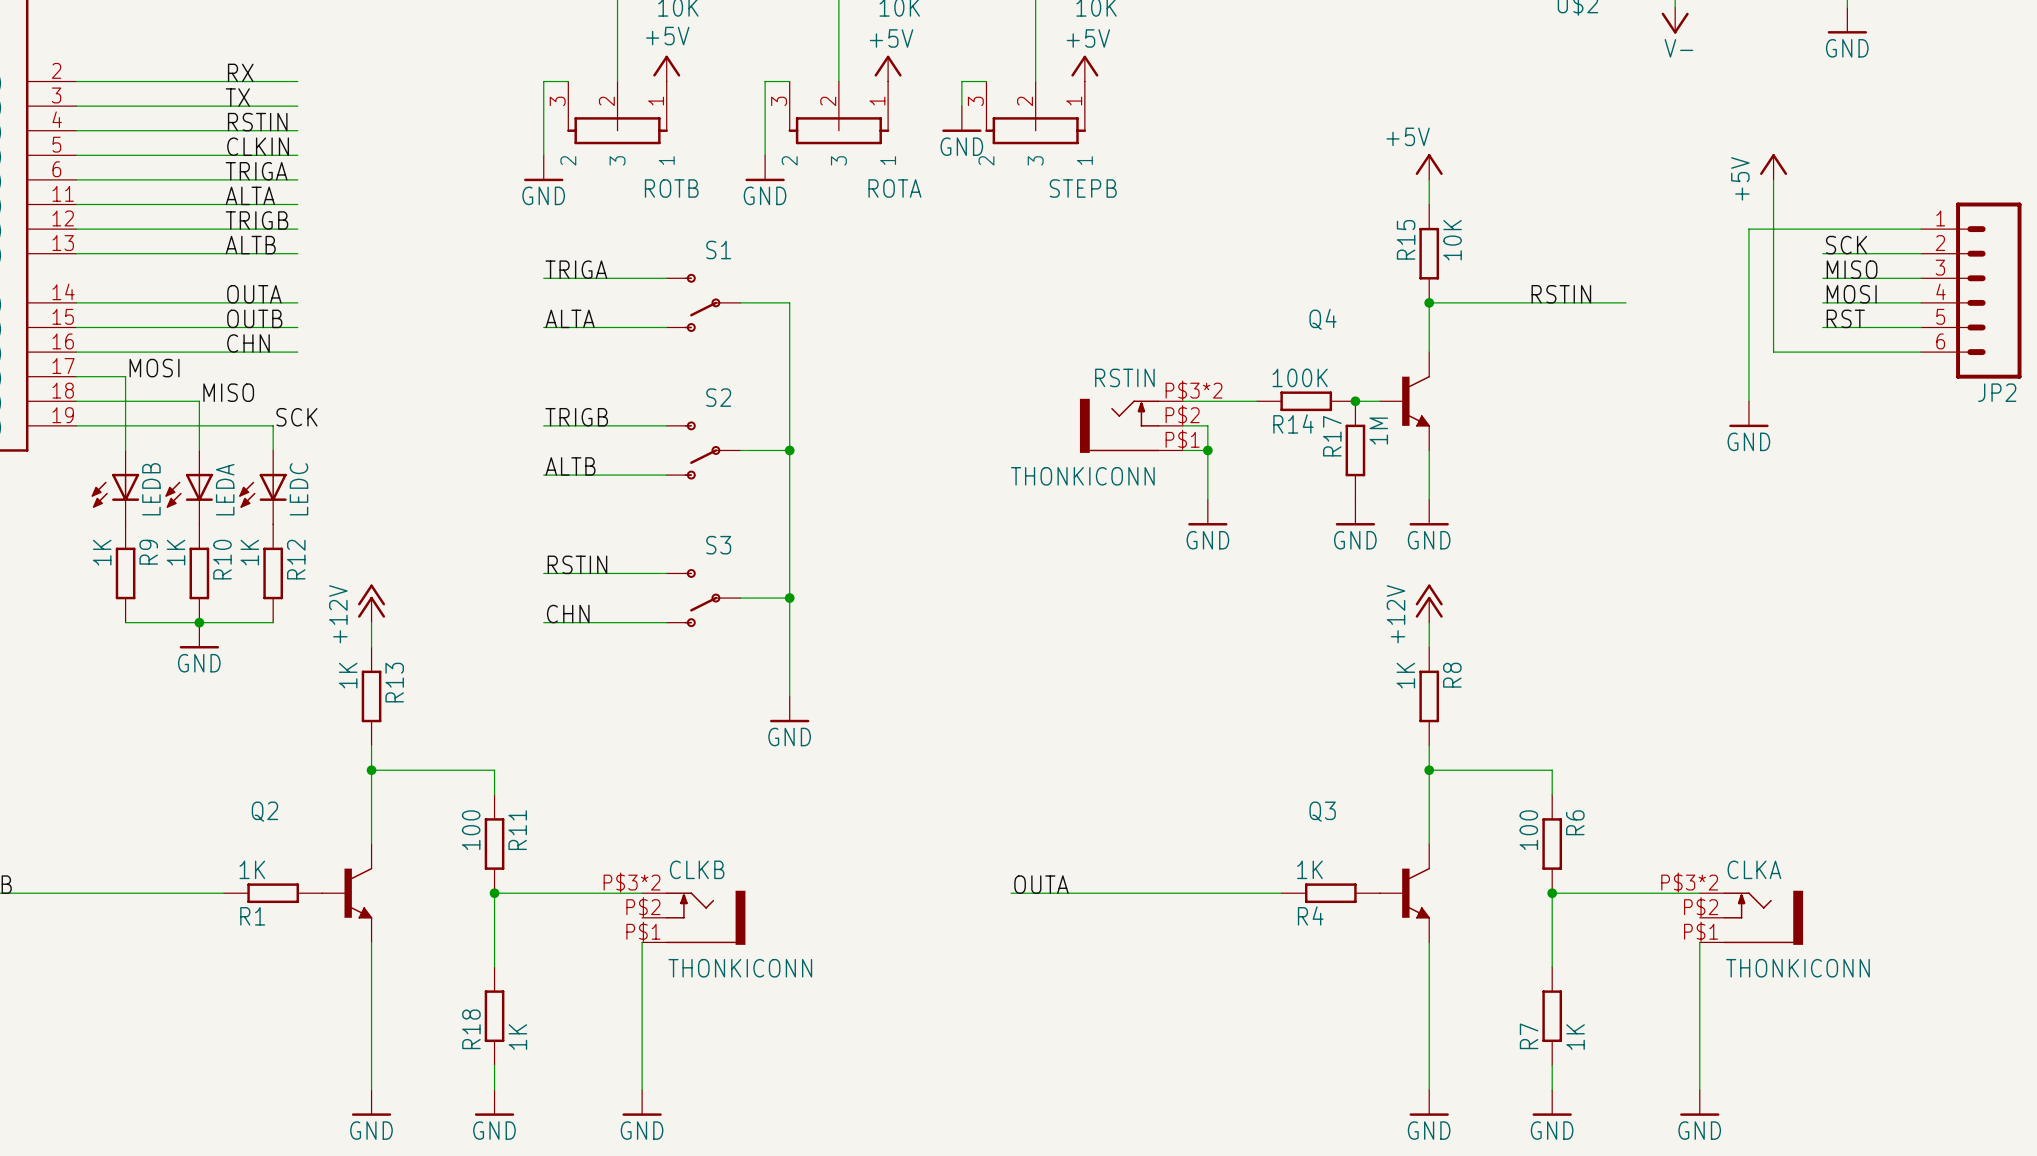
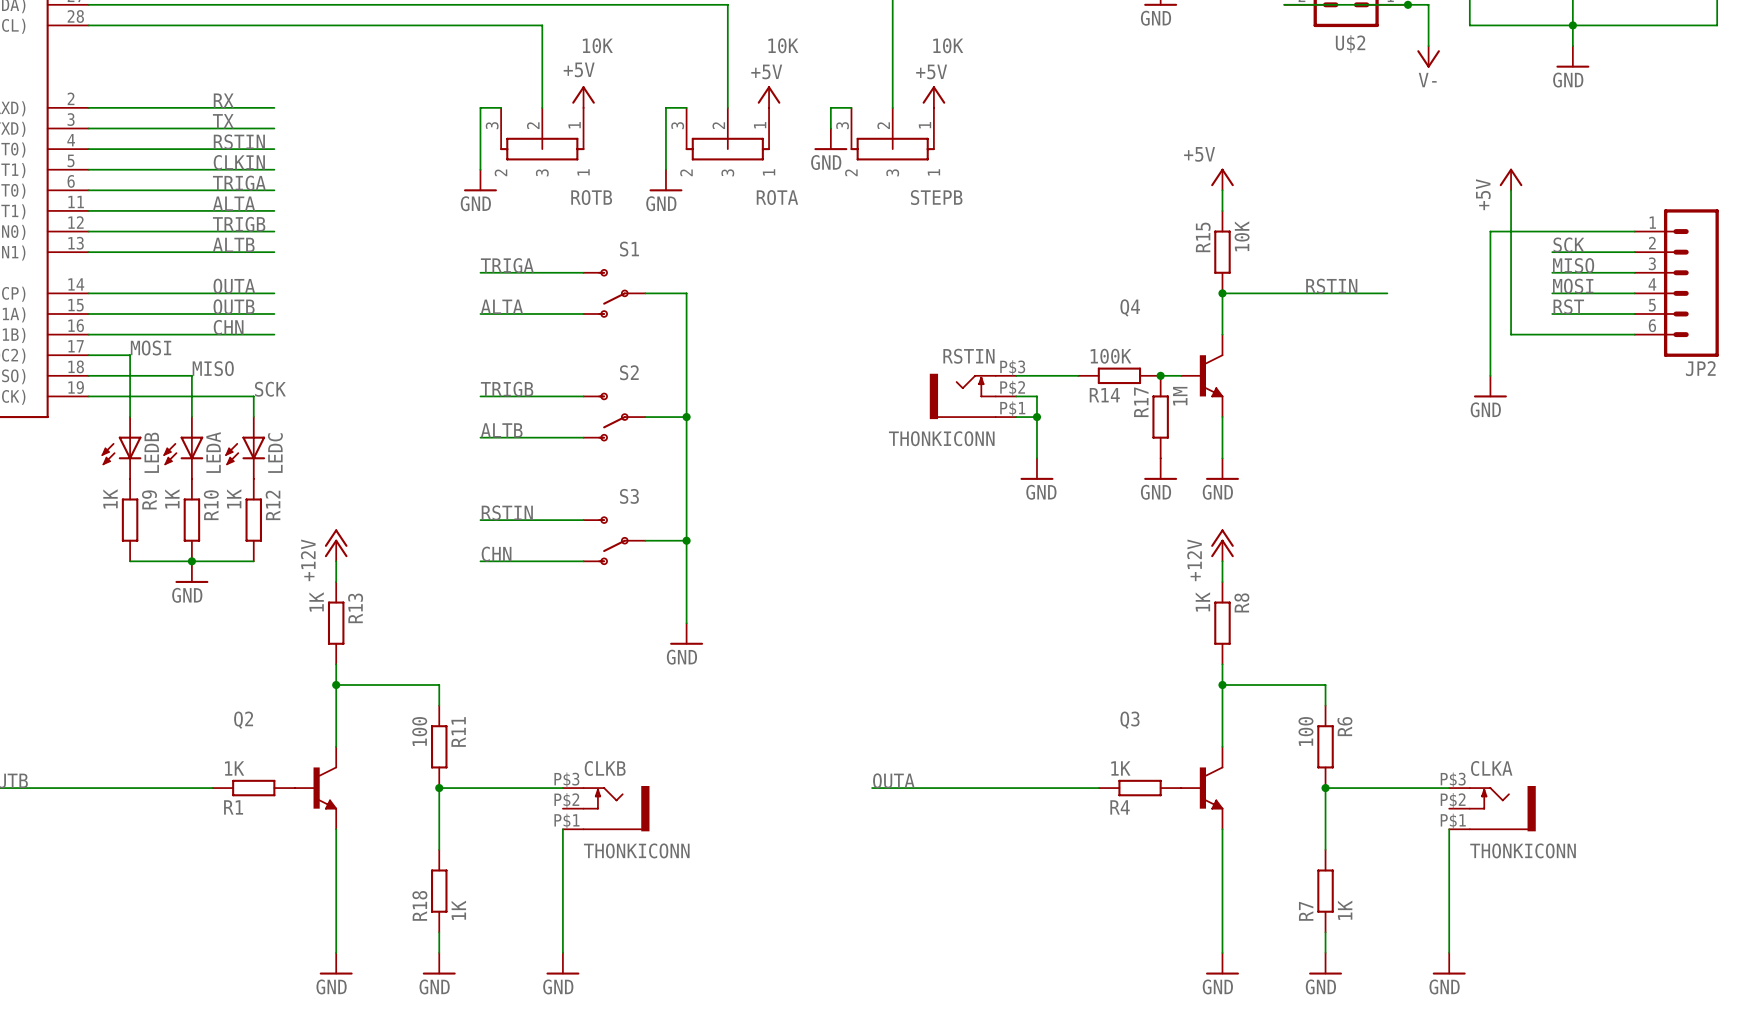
RSTIN pin number: P$3*2 (1194, 390) -> P$3 (1012, 367)
CLKB pin number: P$3*2 (632, 882) -> P$3 (566, 780)
CLKA pin number: P$3*2 (1689, 882) -> P$3 (1453, 780)

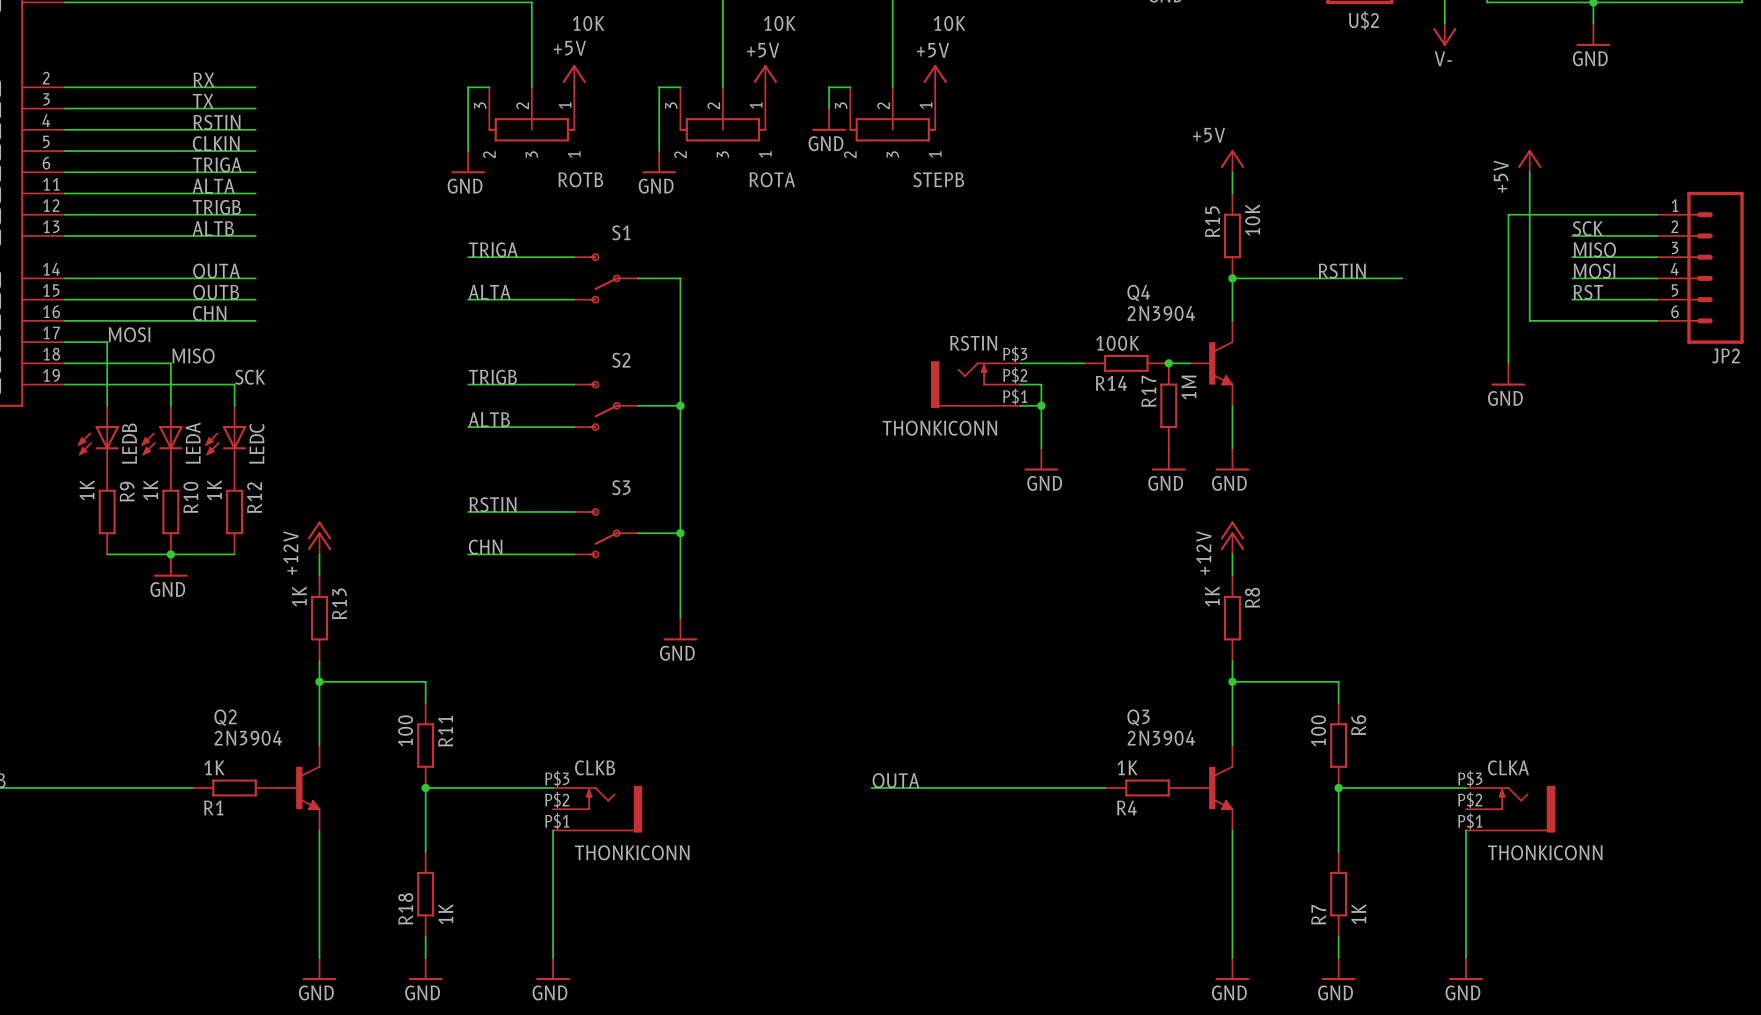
Q4 value: none -> 2N3904 (1161, 313)
Q2 value: none -> 2N3904 (248, 738)
Q3 value: none -> 2N3904 (1161, 738)

